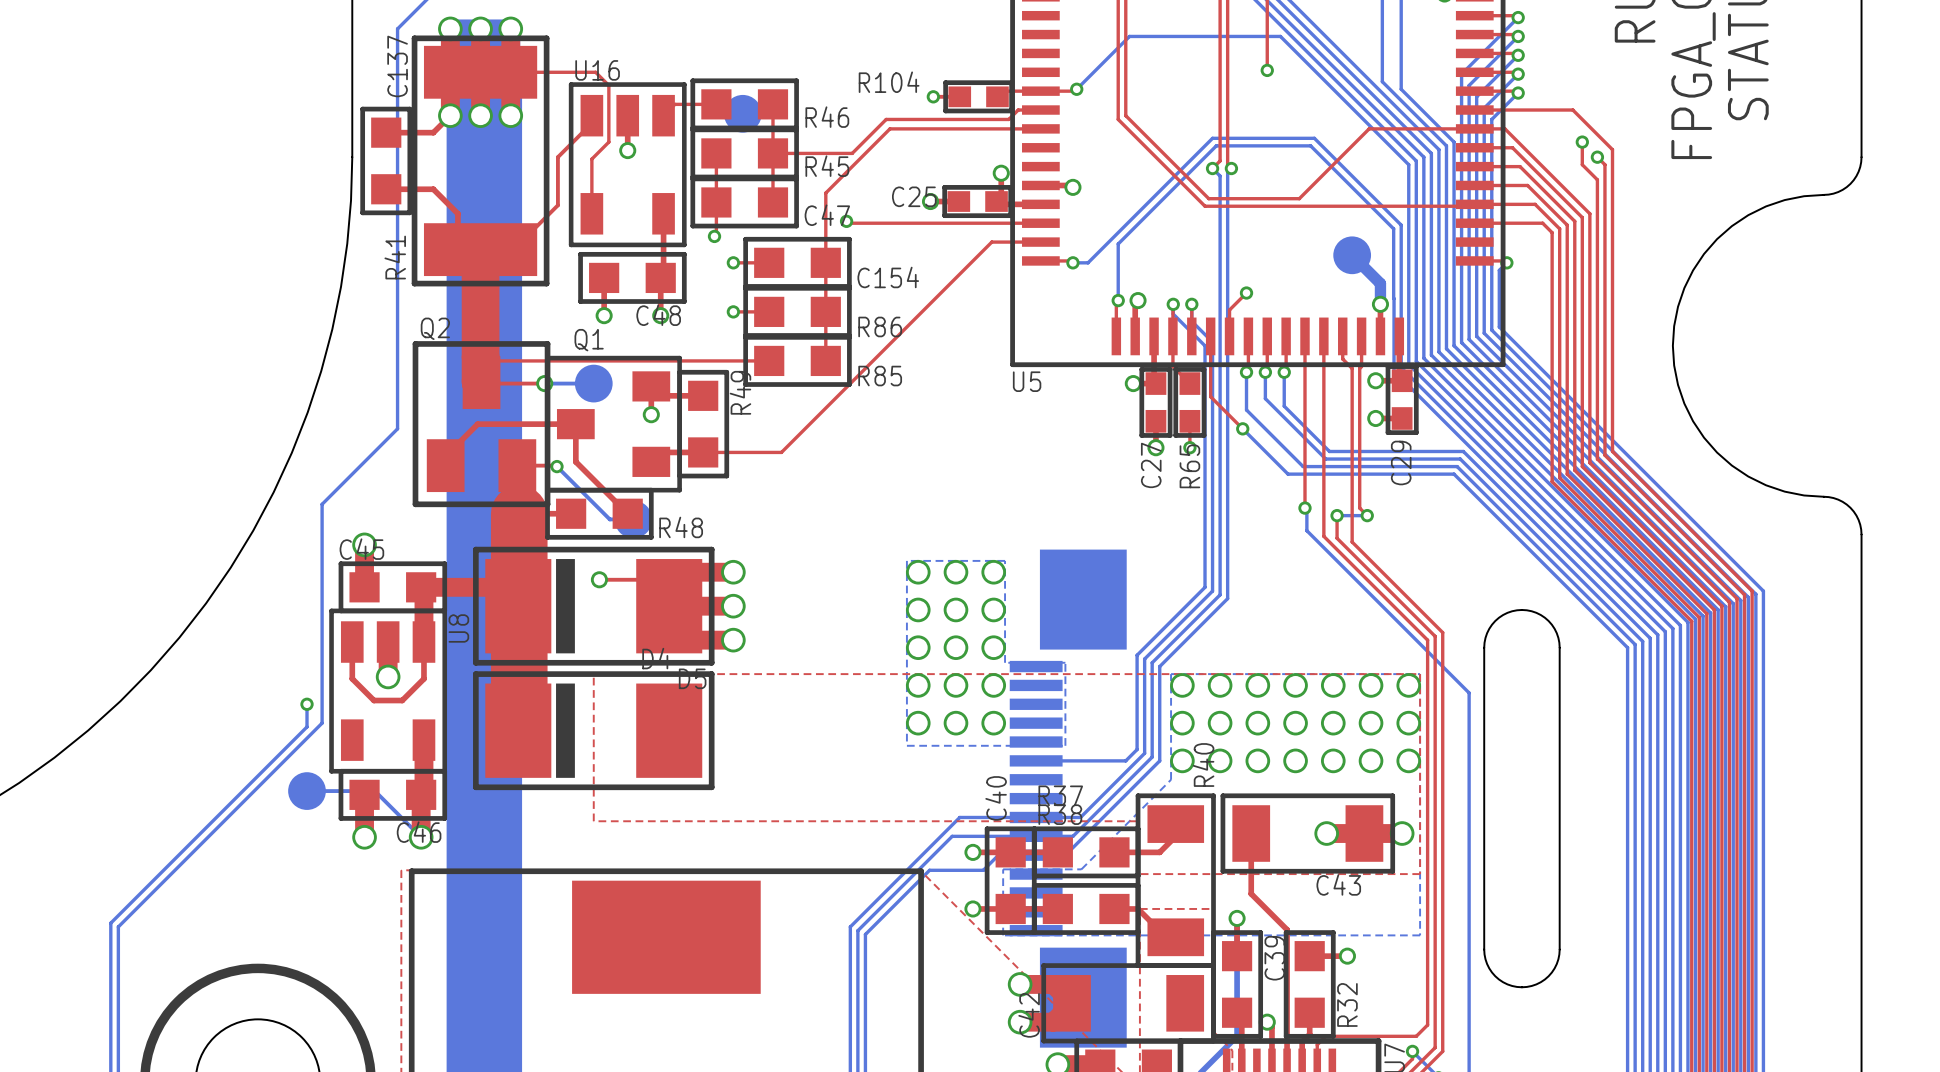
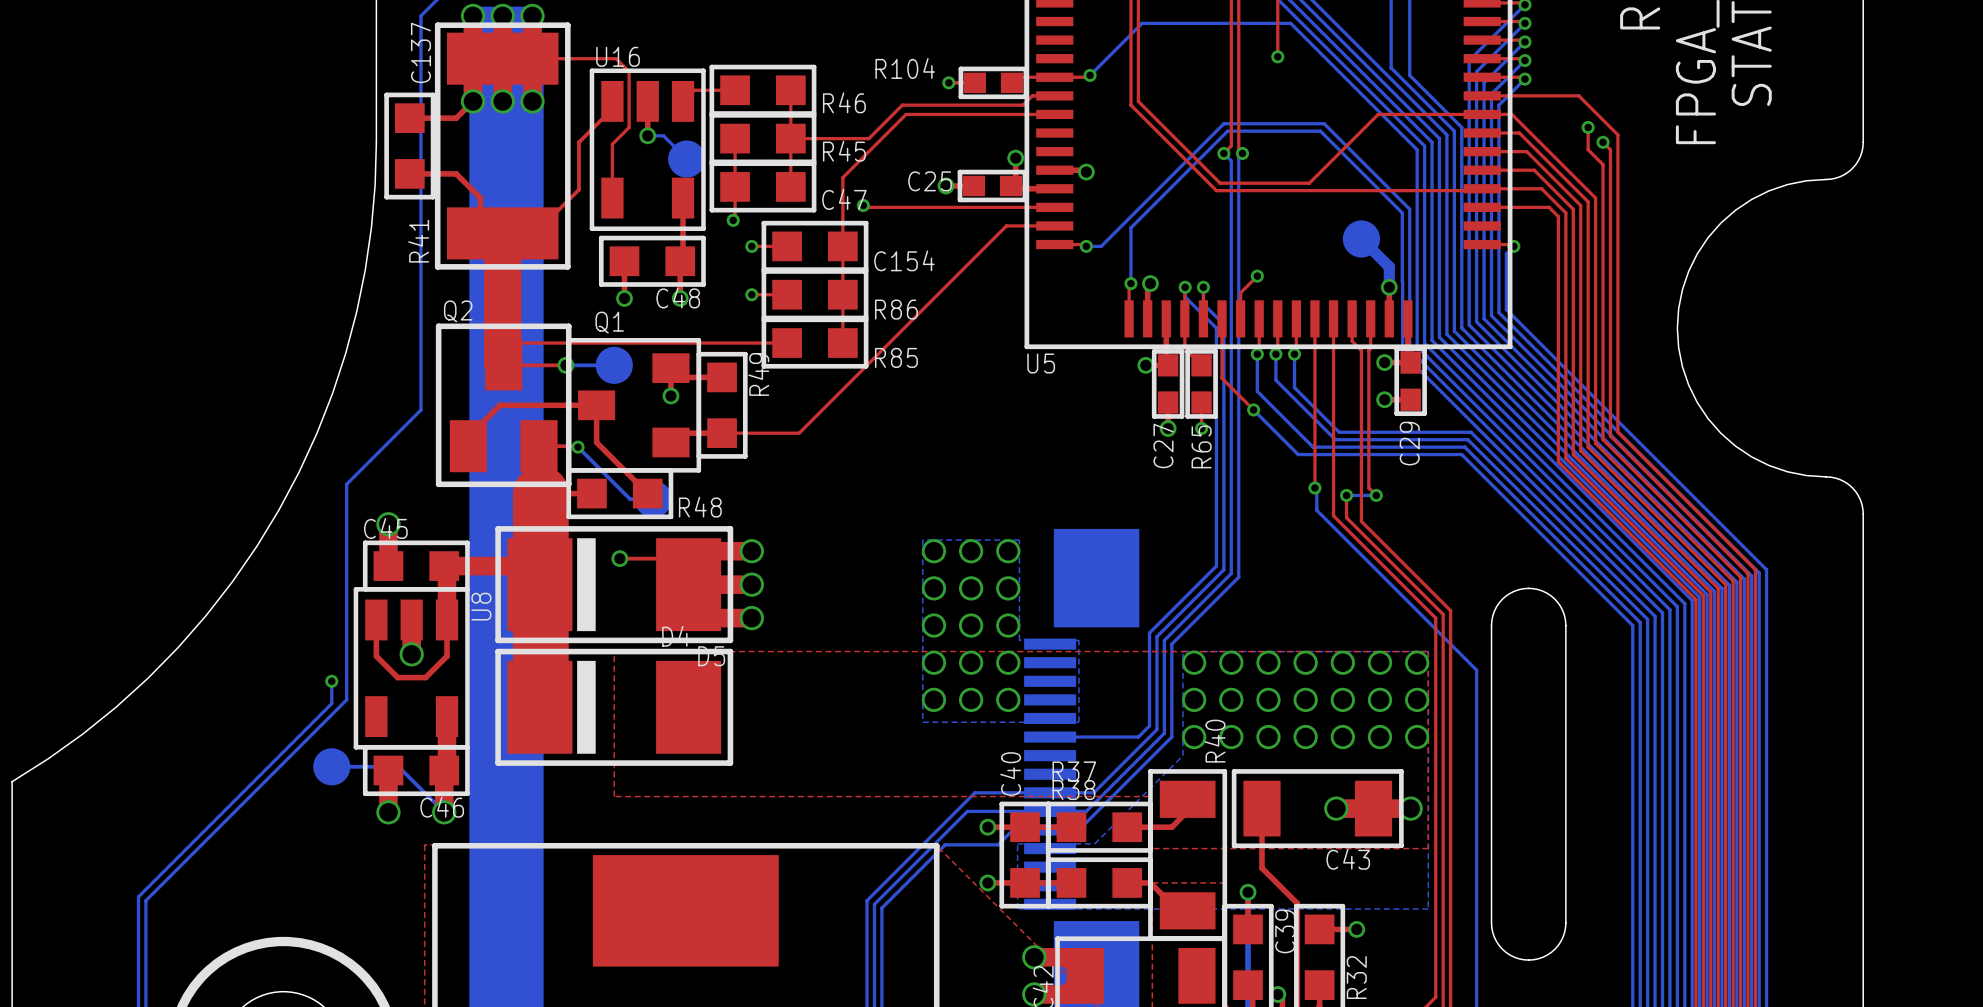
part position: (742, 113) -> (686, 159)
bottom track: none -> (647, 135) (663, 135) (686, 159)

